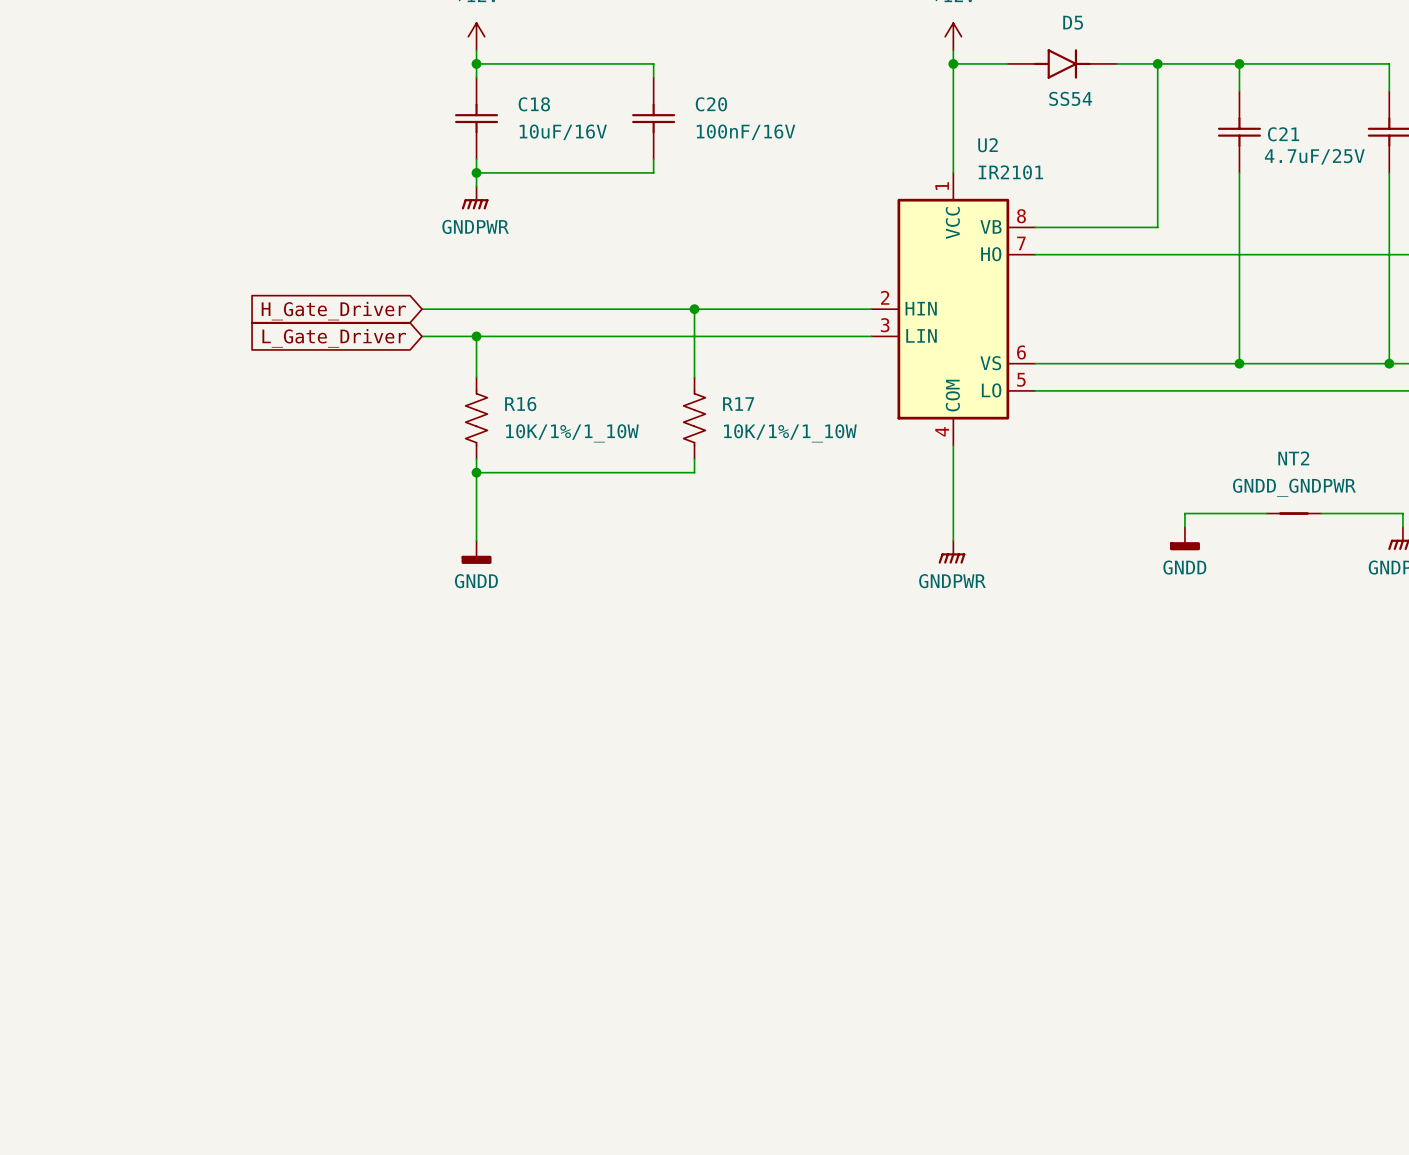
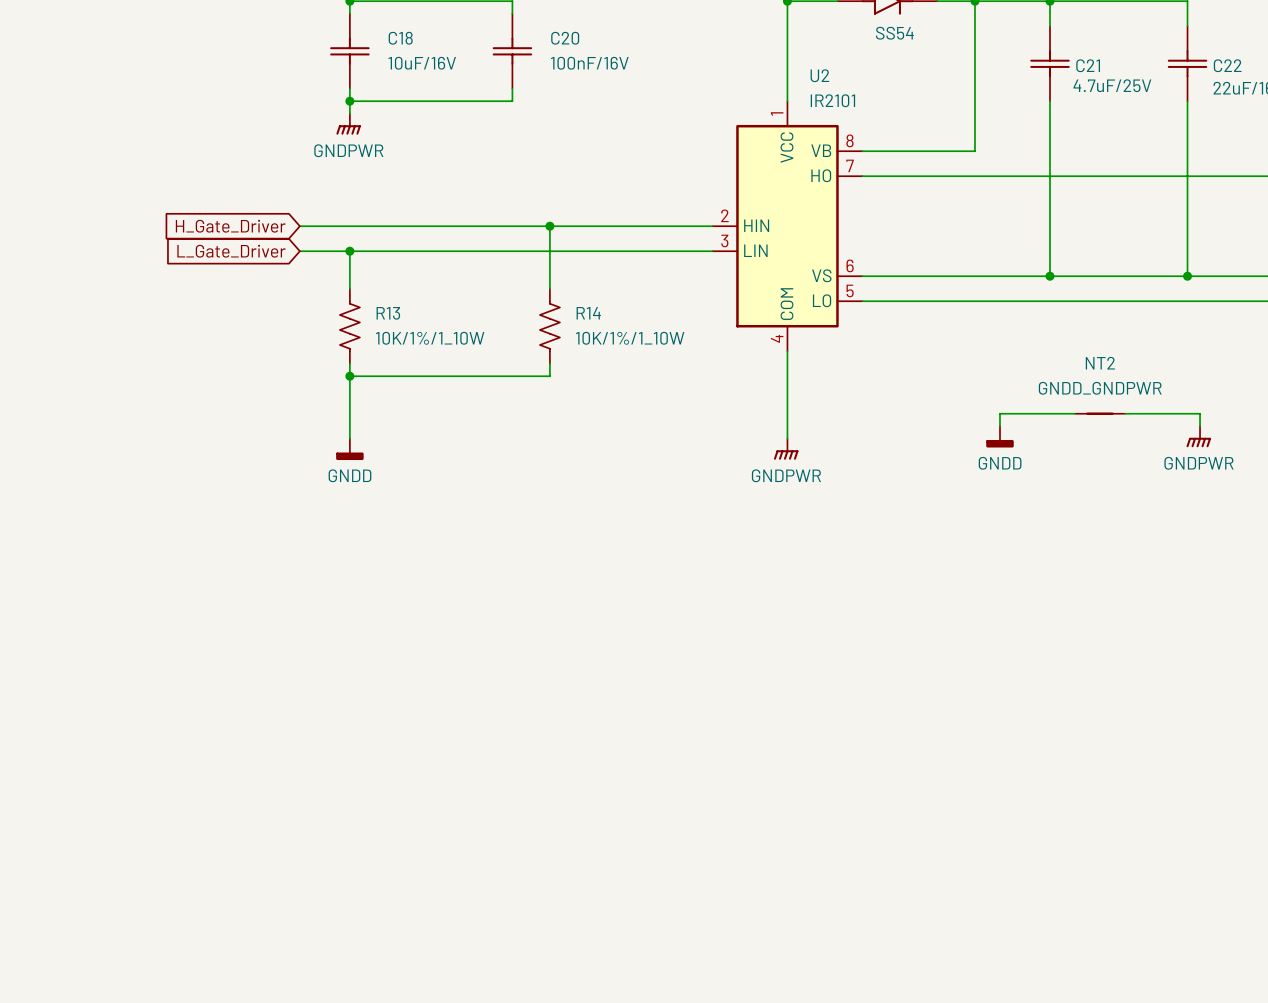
R16 name: R16 (520, 404) -> R13 (388, 313)
R17 name: R17 (738, 404) -> R14 (588, 313)

